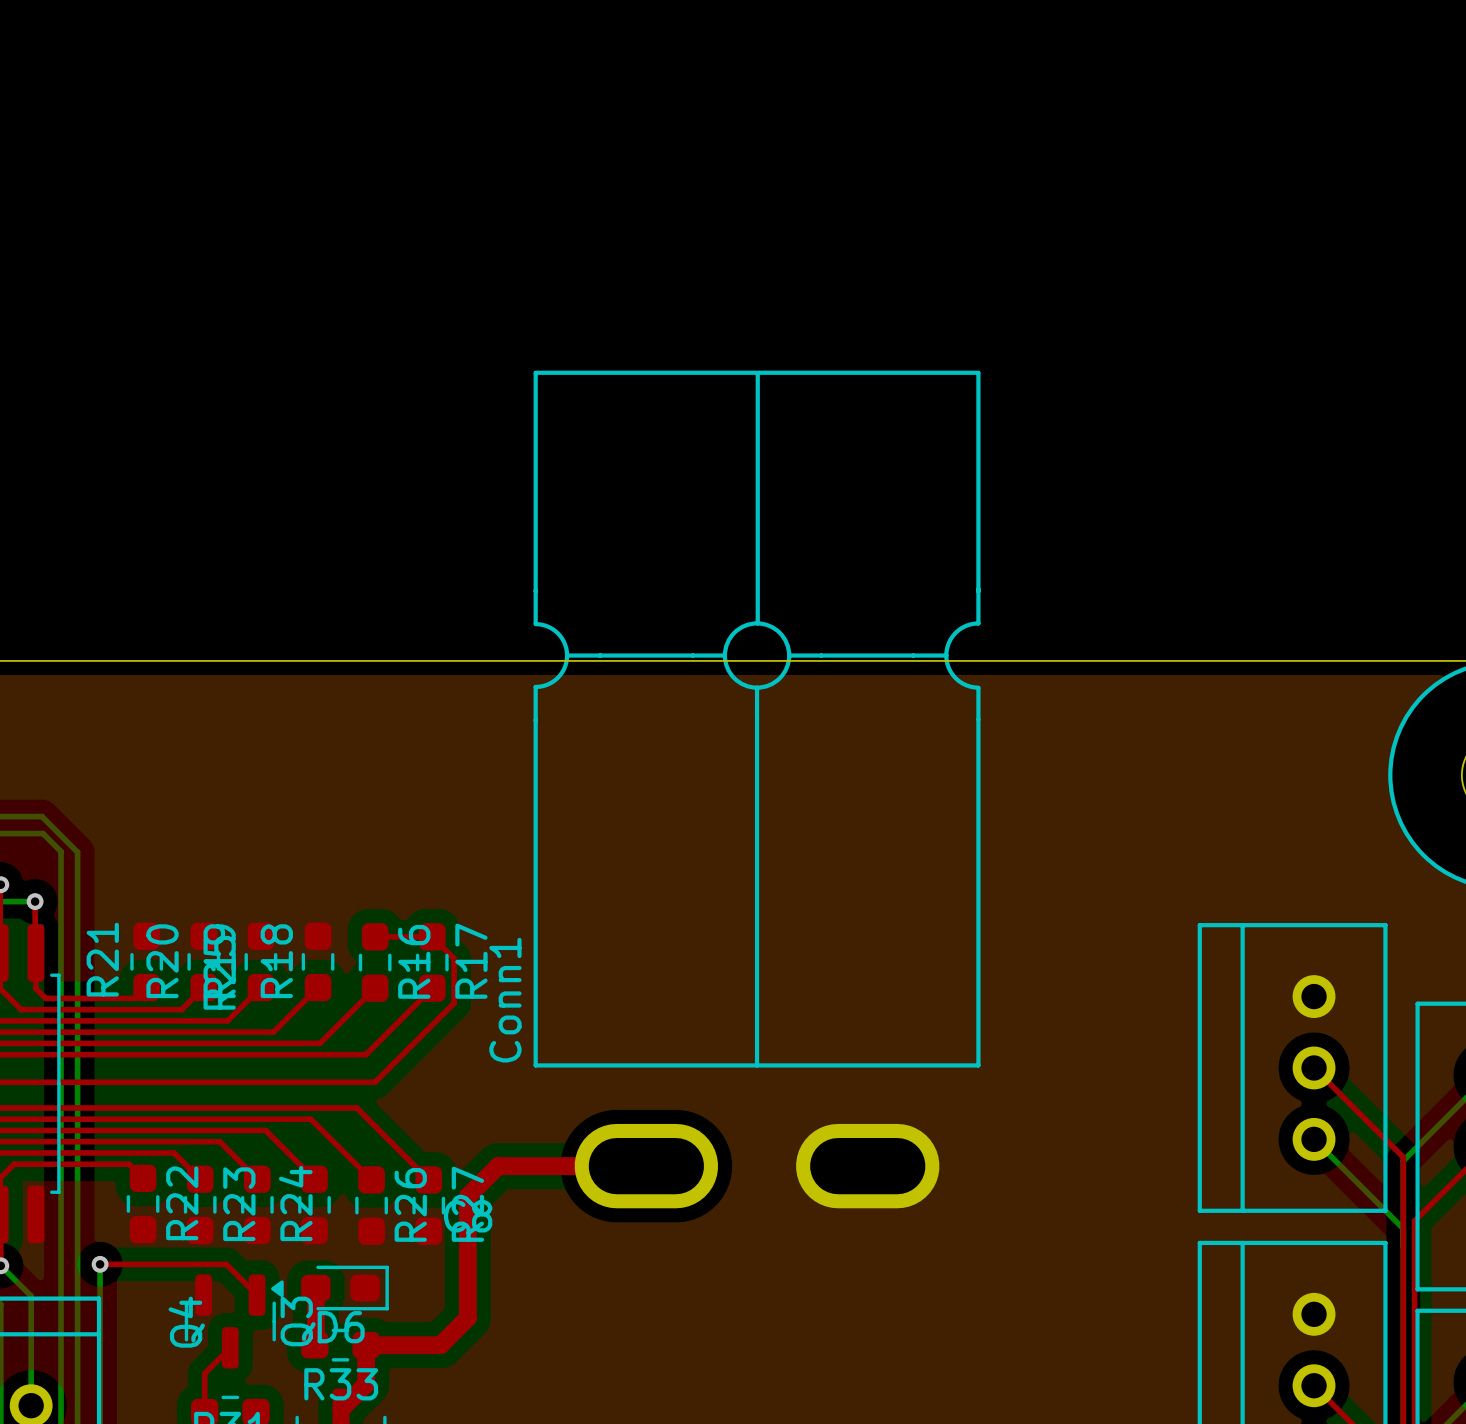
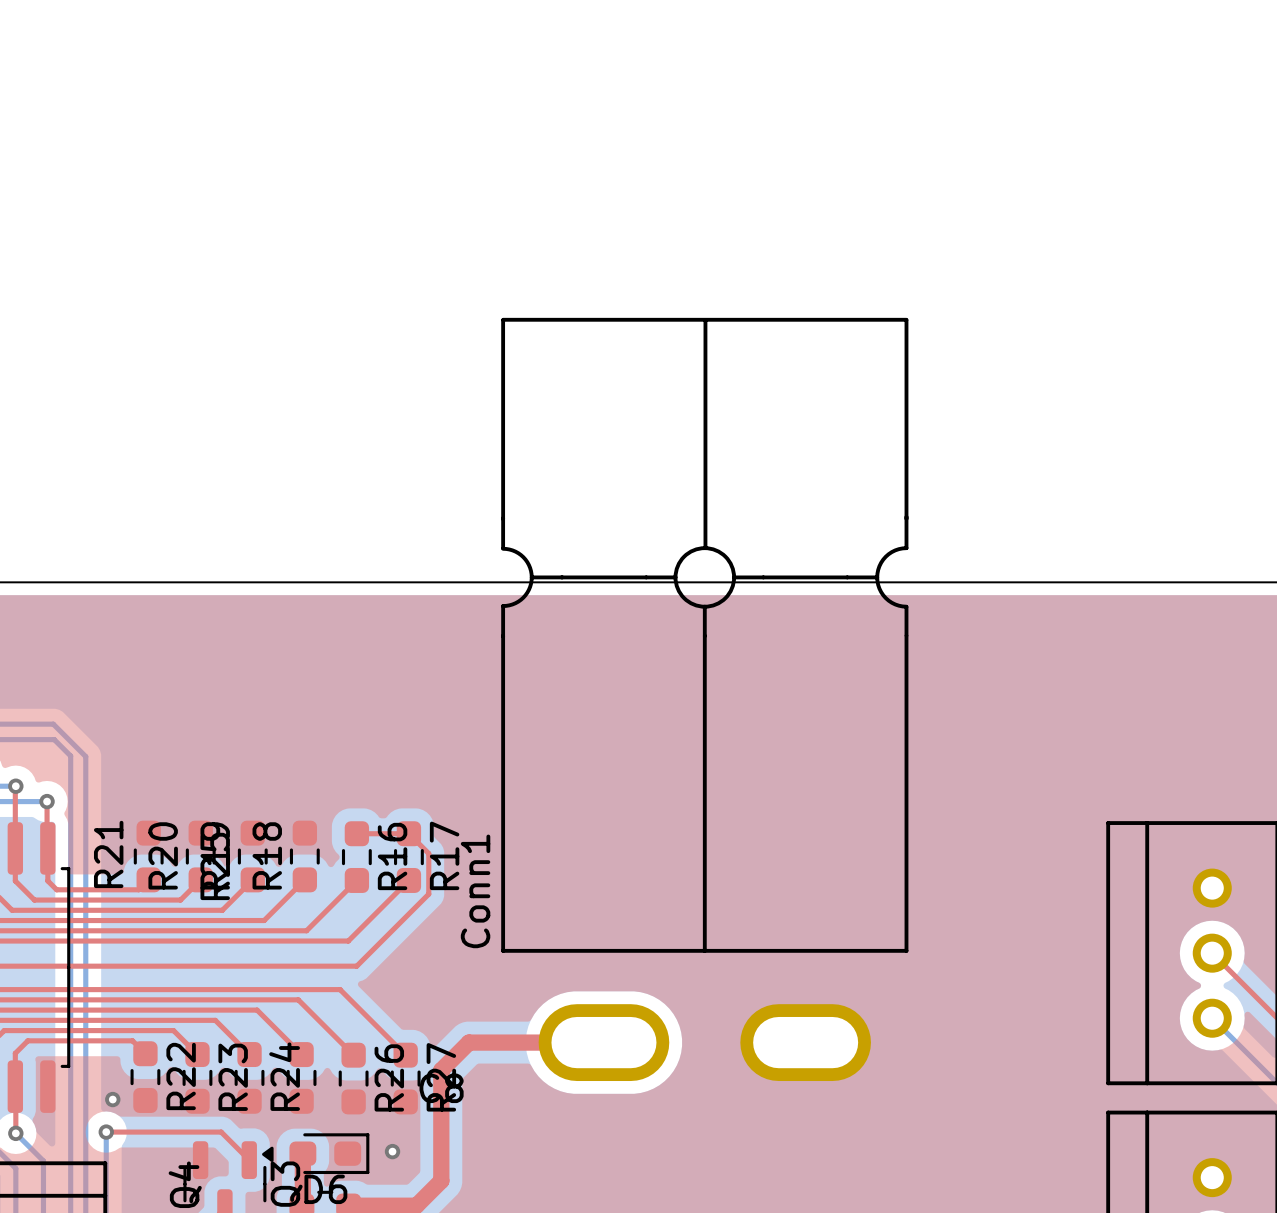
via: none -> (112, 1099)
via: none -> (392, 1151)

